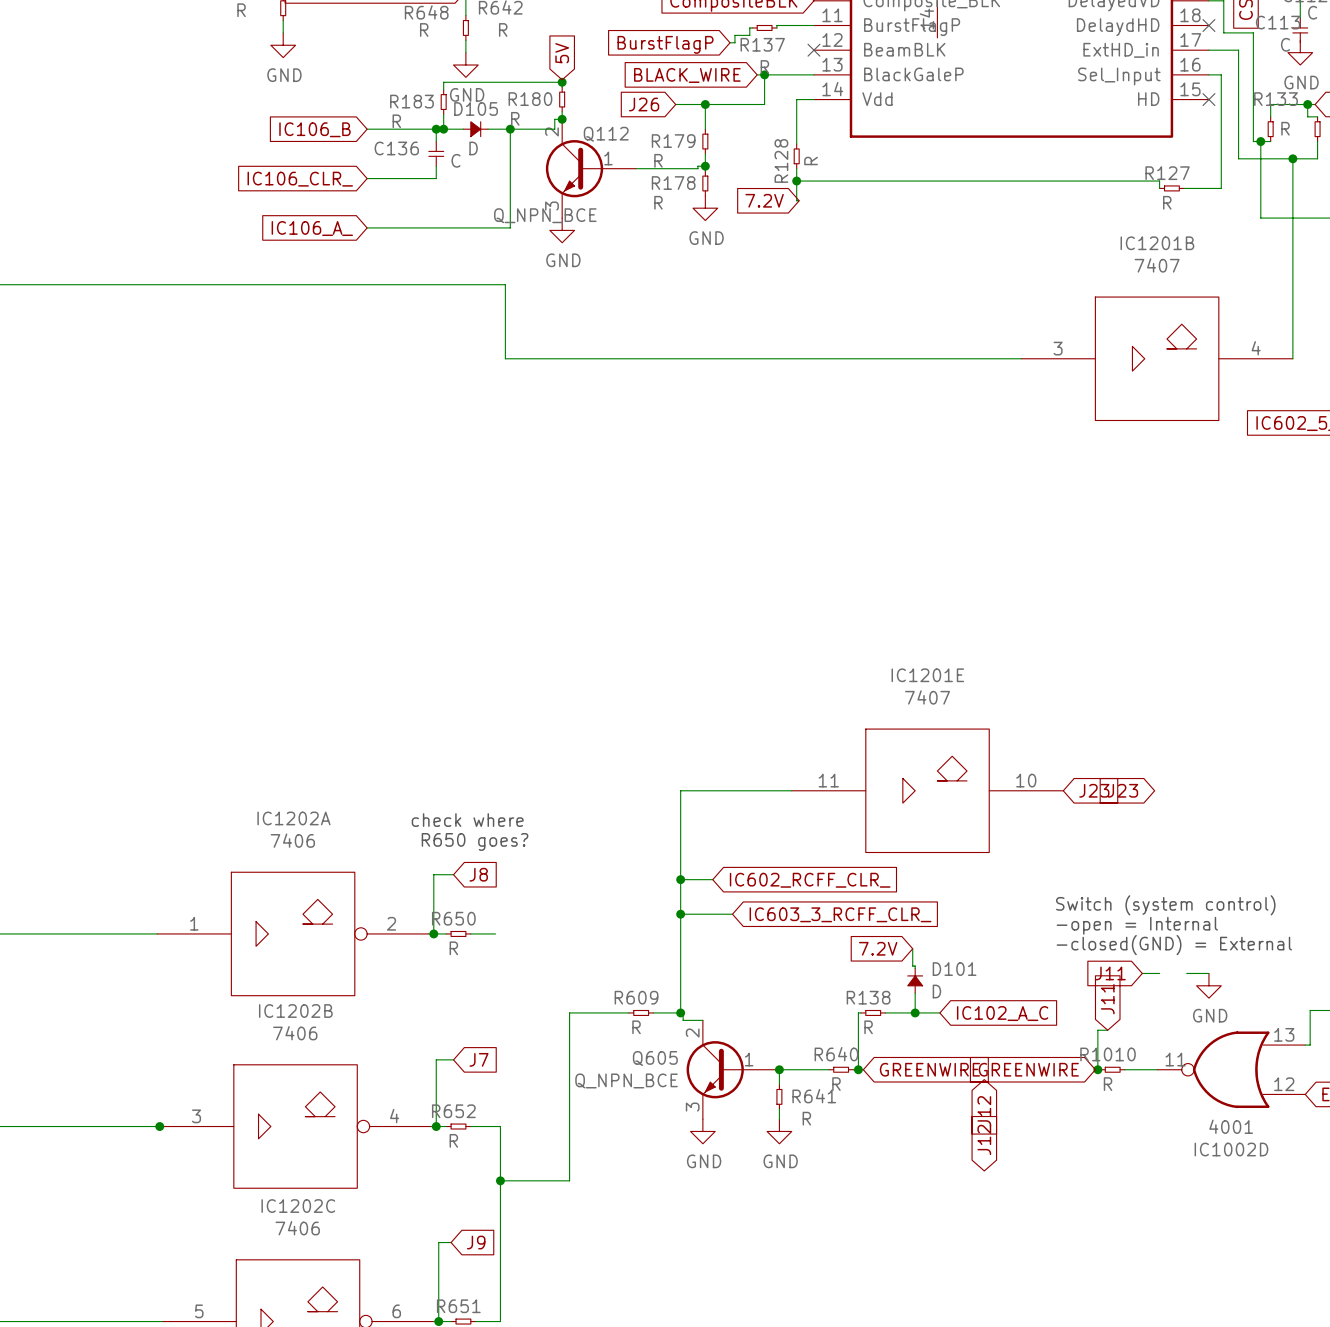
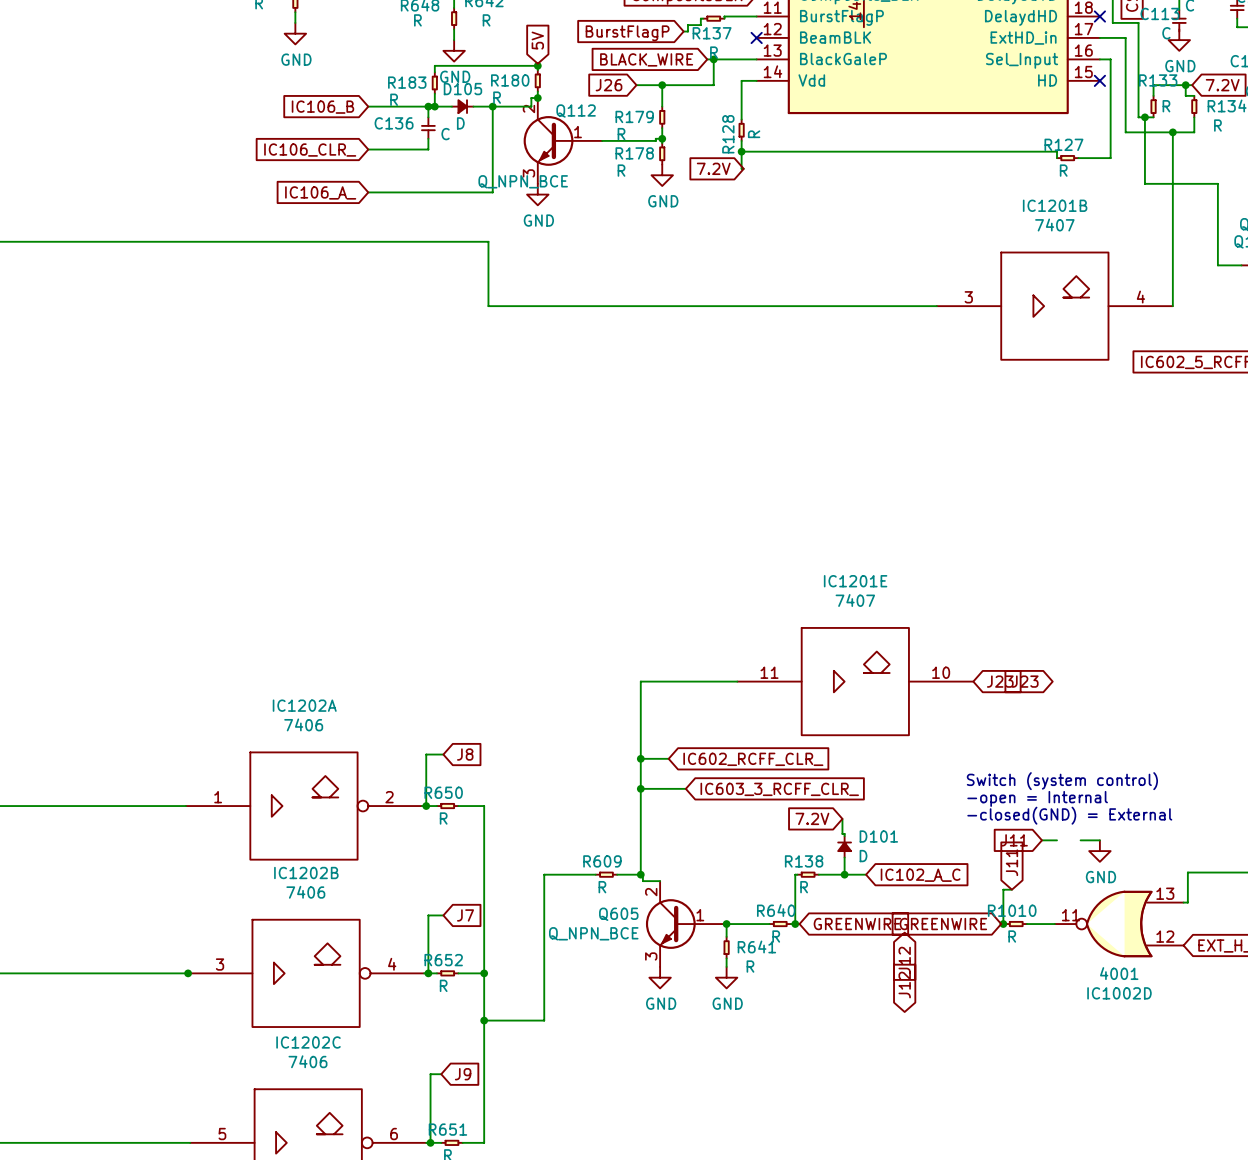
text: check where (467, 820) -> none
text: R650 goes? (475, 841) -> none
wire: none -> (479, 806) (484, 806) (484, 973)
junction: none -> (484, 973)

